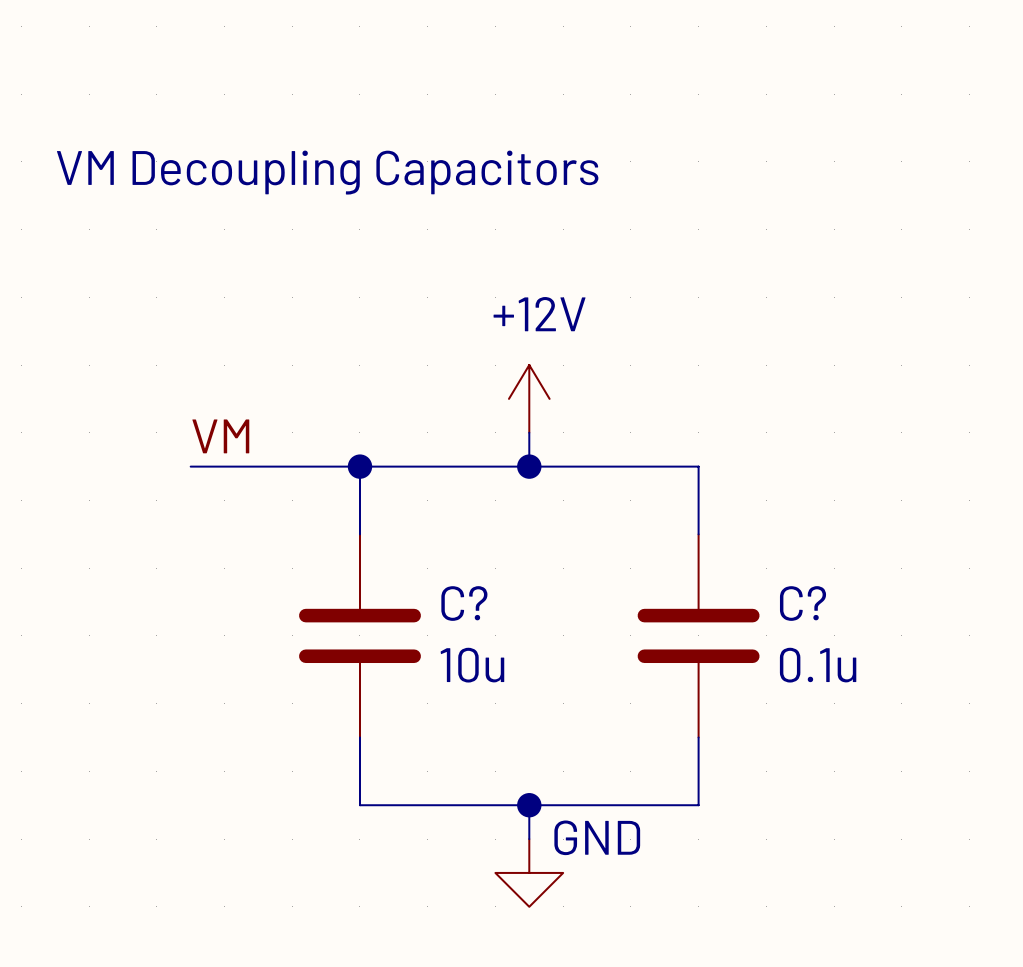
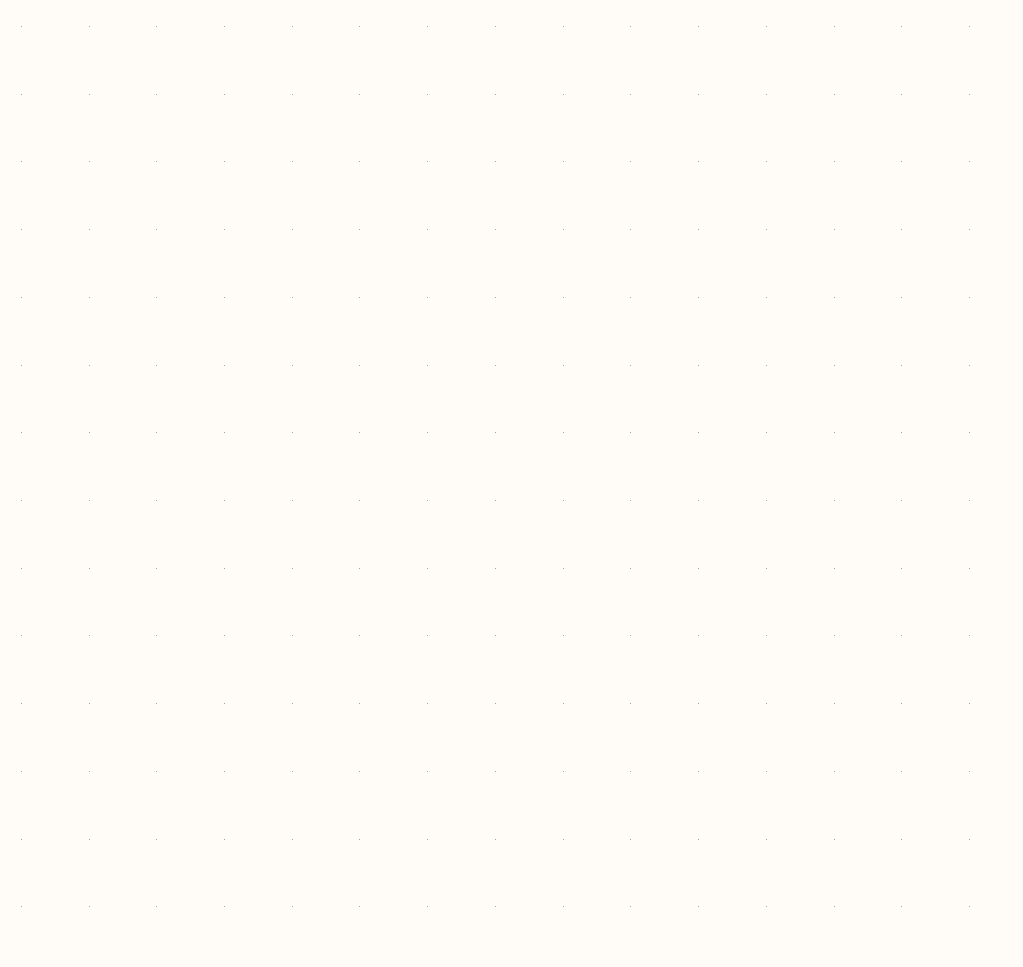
text: VM Decoupling Capacitors (327, 172) -> none
power symbol: +12V (529, 398) -> none
wire: (529, 432) (529, 466) -> none
label: VM (220, 436) -> none
wire: (190, 466) (698, 466) (698, 534) -> none
wire: (359, 466) (359, 534) -> none
junction: (359, 466) -> none
junction: (529, 466) -> none
C?: 10u (359, 635) -> none
C?: 0.1u (698, 635) -> none
wire: (359, 737) (359, 805) (698, 805) (698, 737) -> none
wire: (529, 805) (529, 839) -> none
junction: (529, 805) -> none
power symbol: GND (529, 872) -> none

